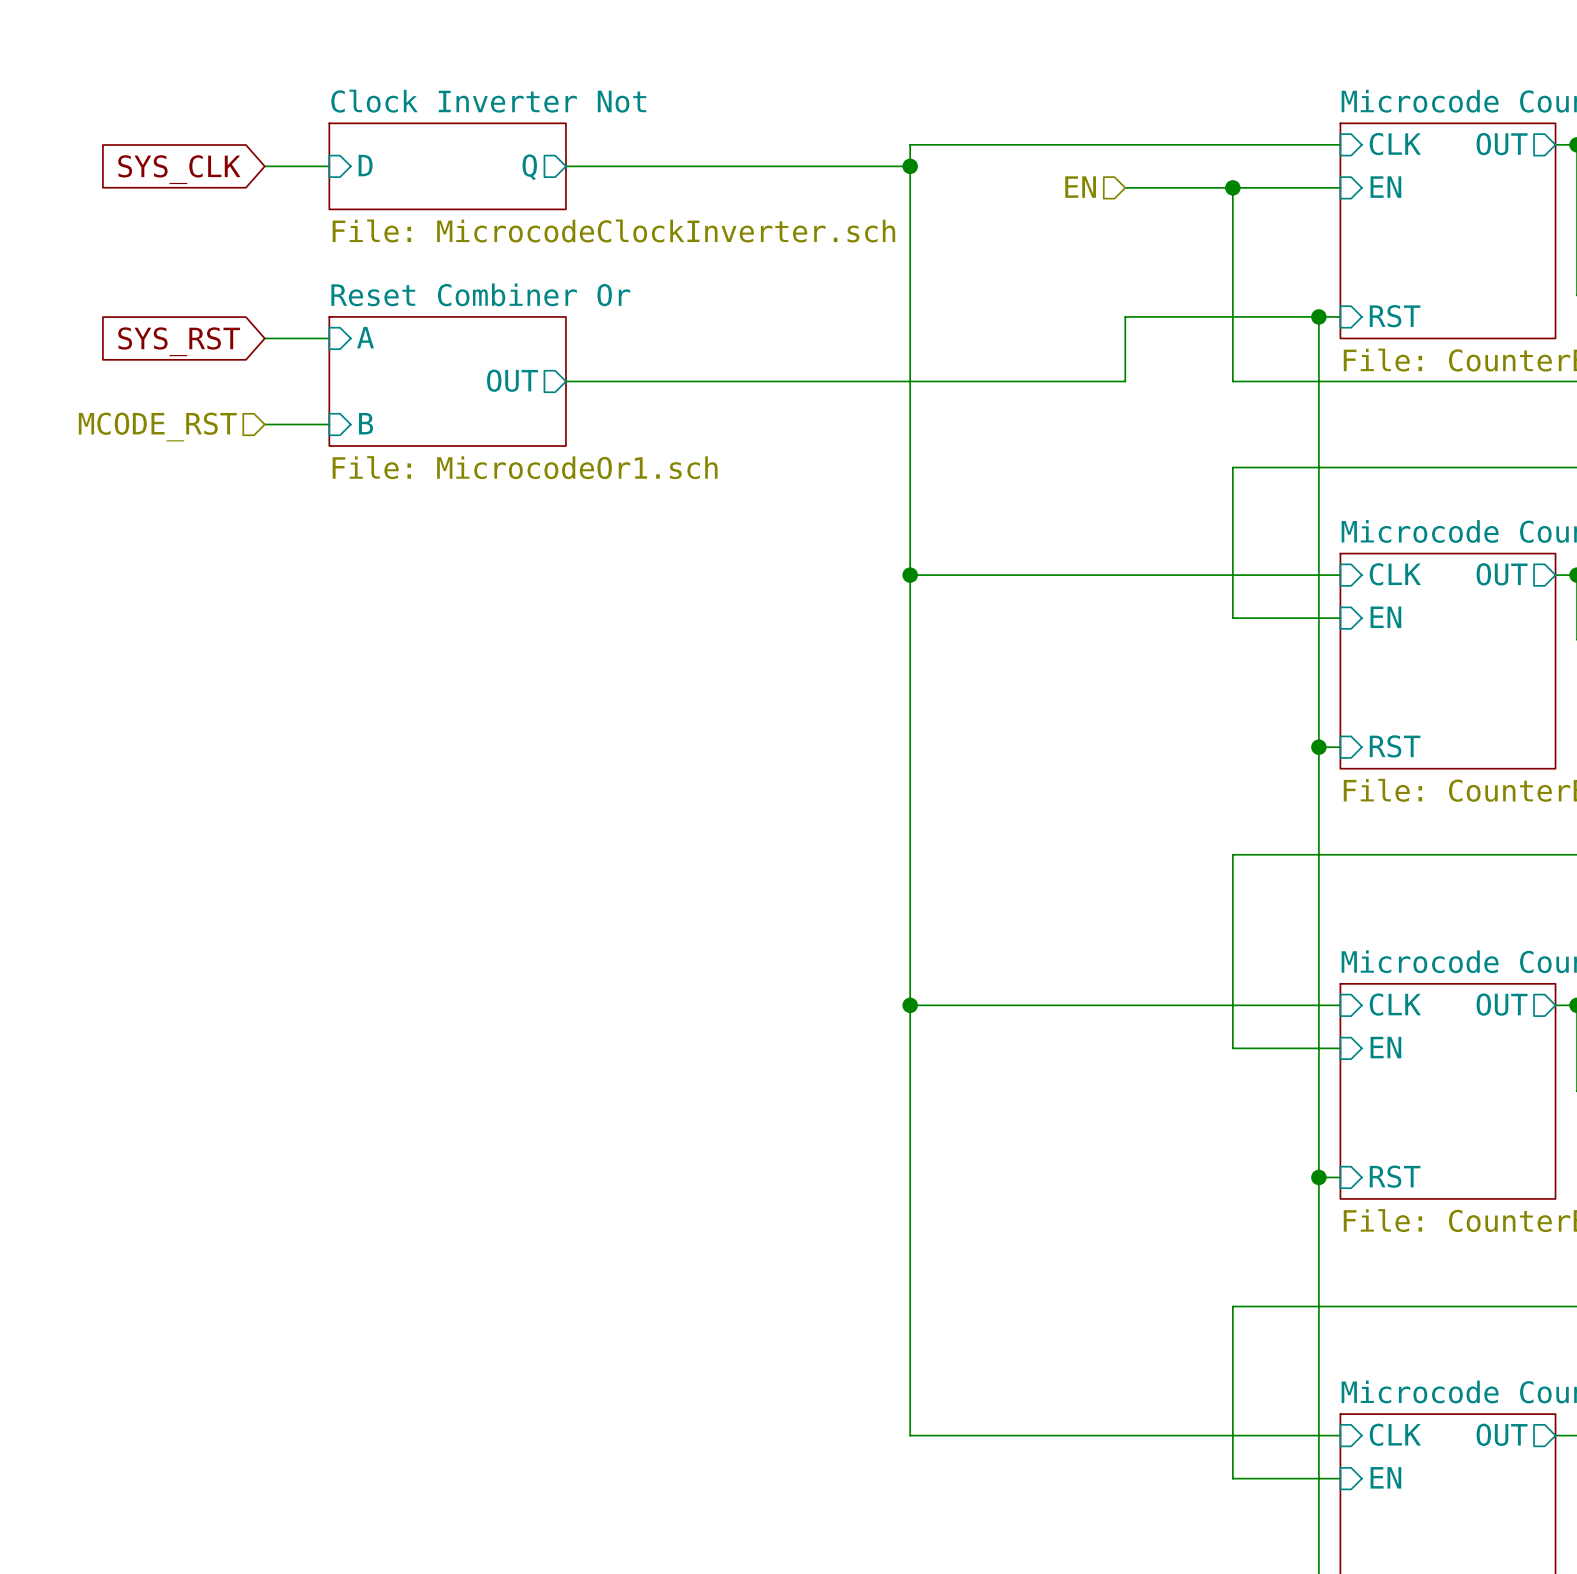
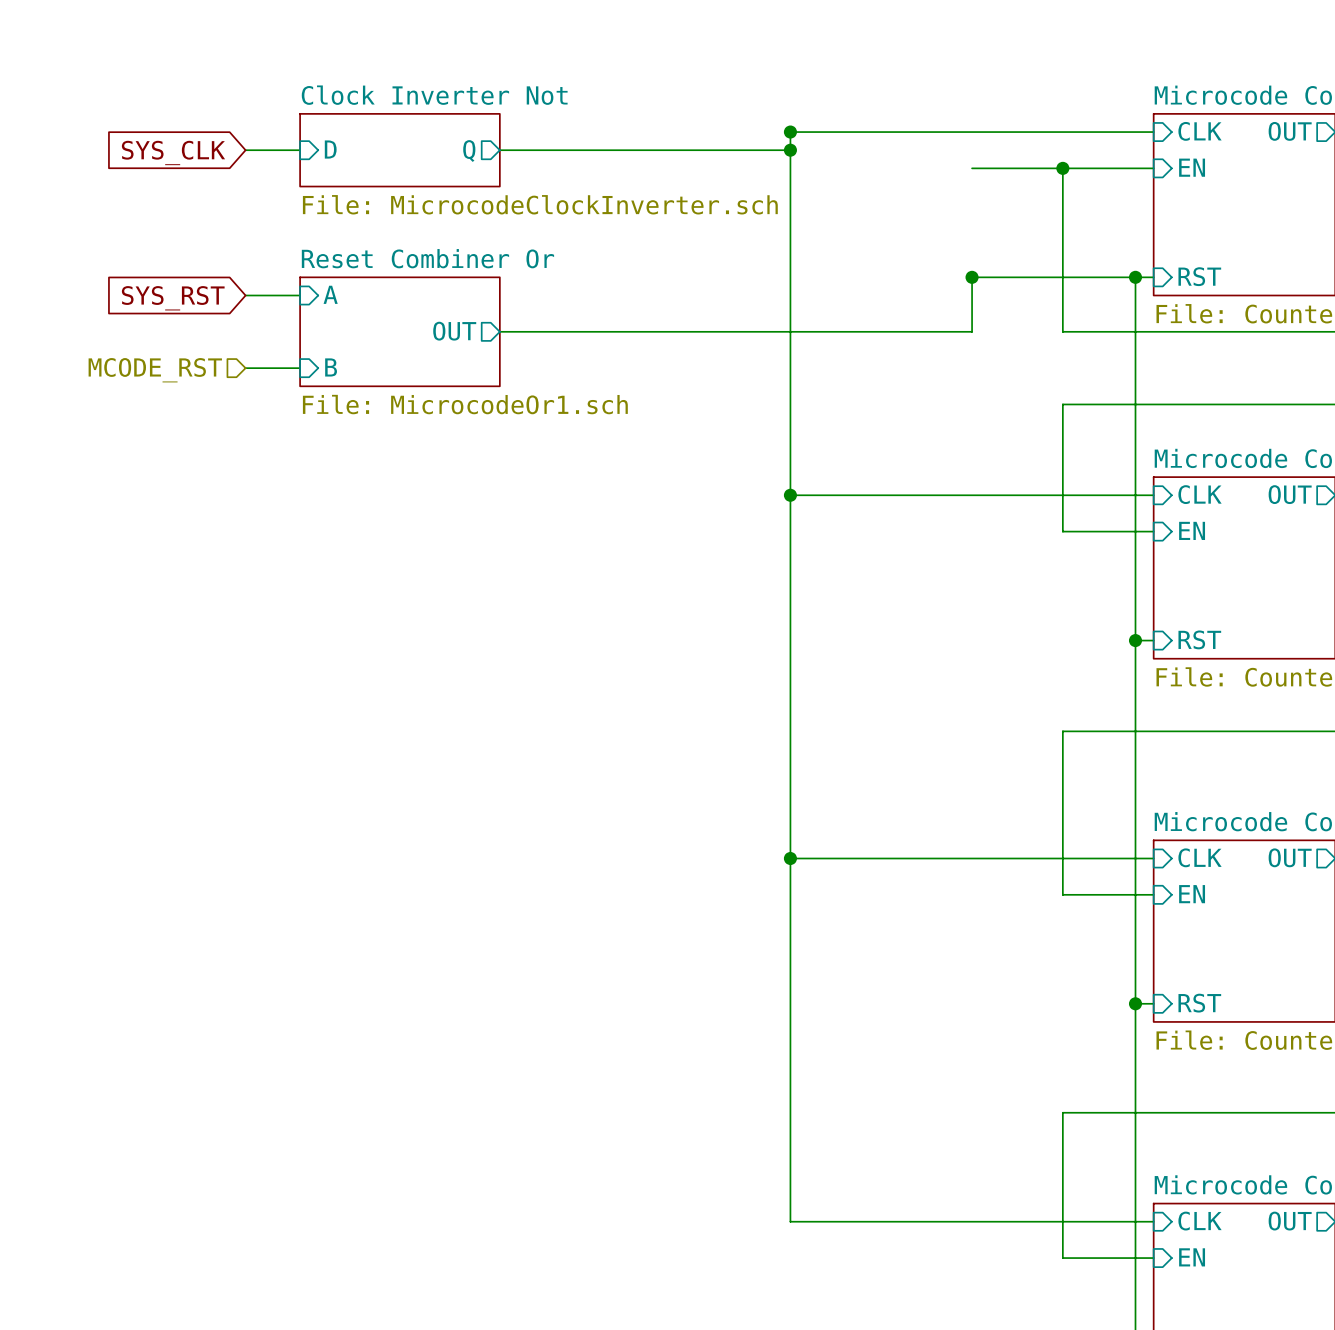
junction: none -> (790, 132)
hierarchical label: EN (1080, 187) -> none
junction: none -> (972, 277)

